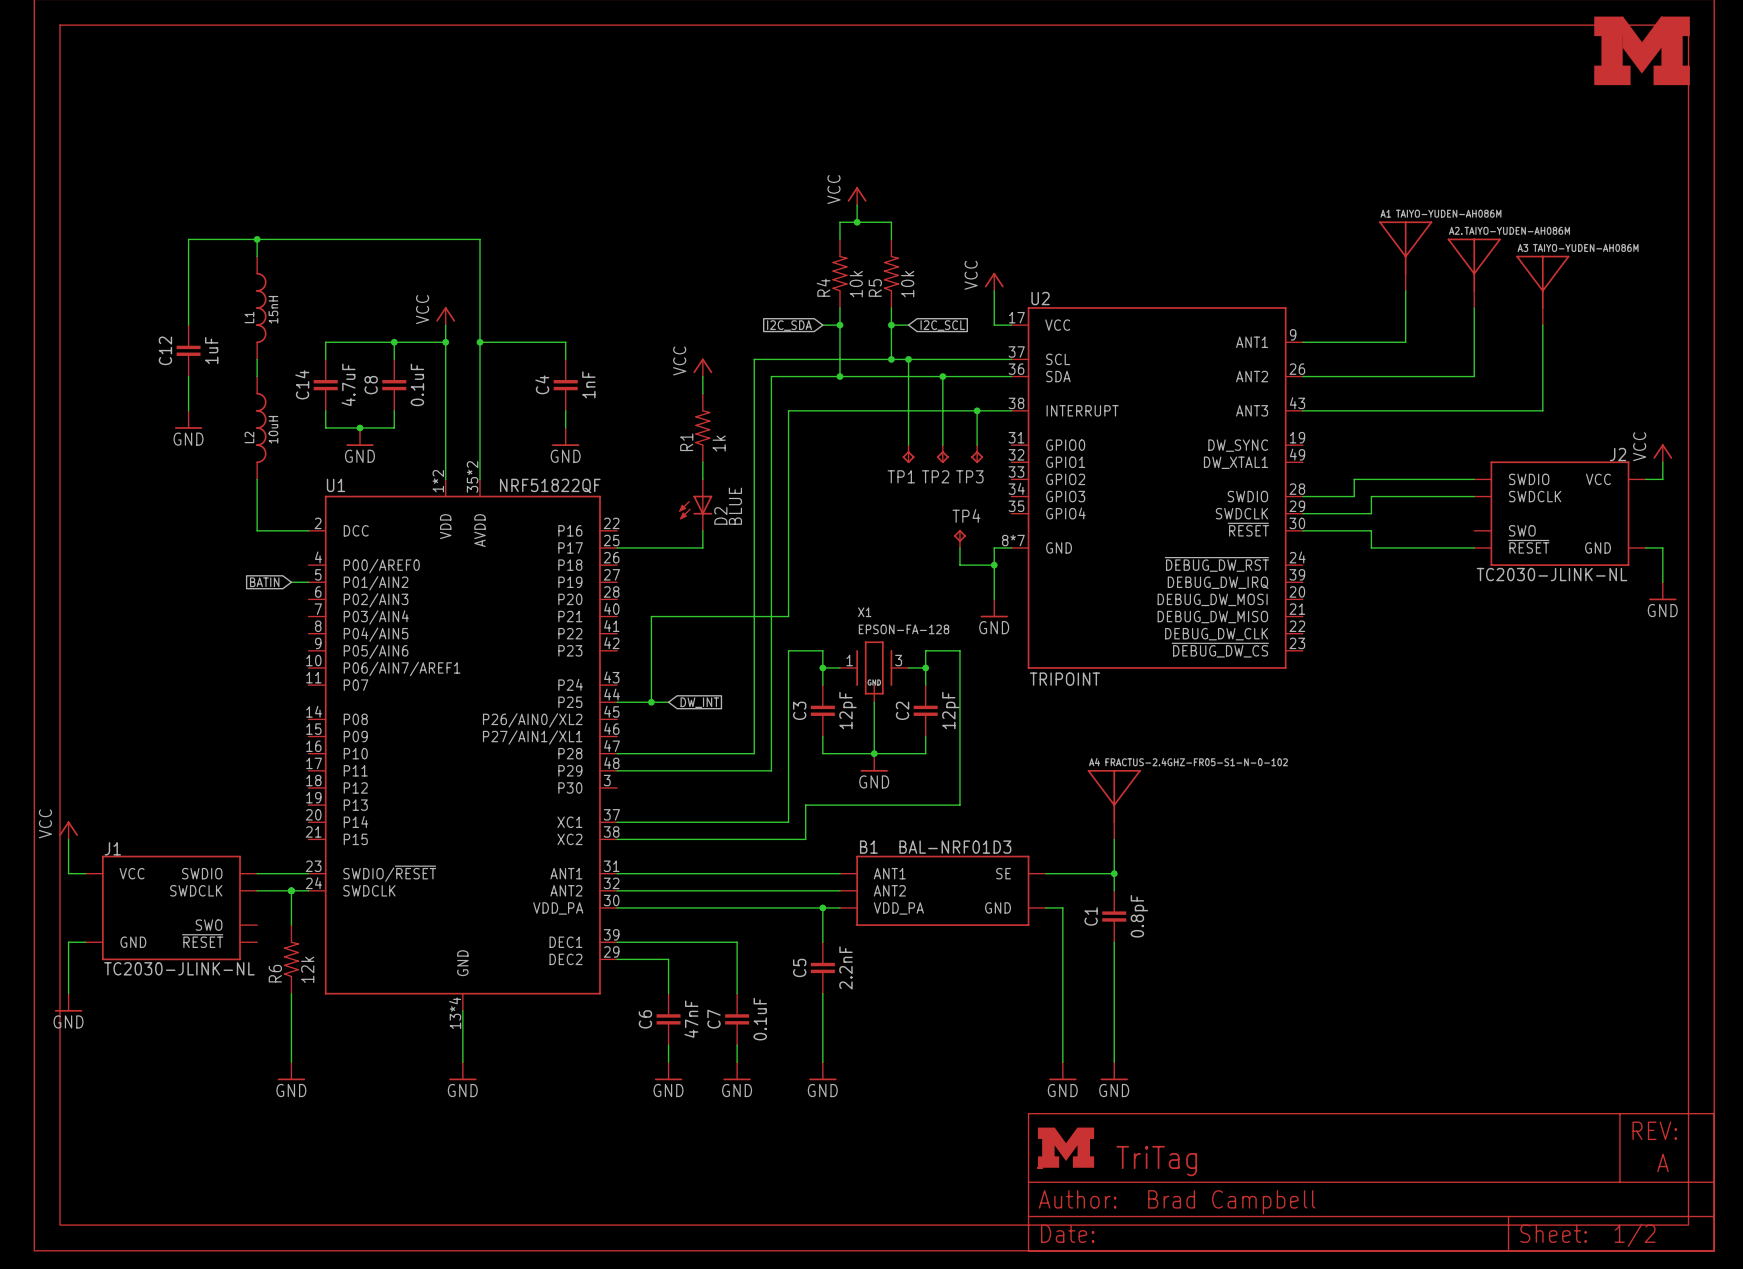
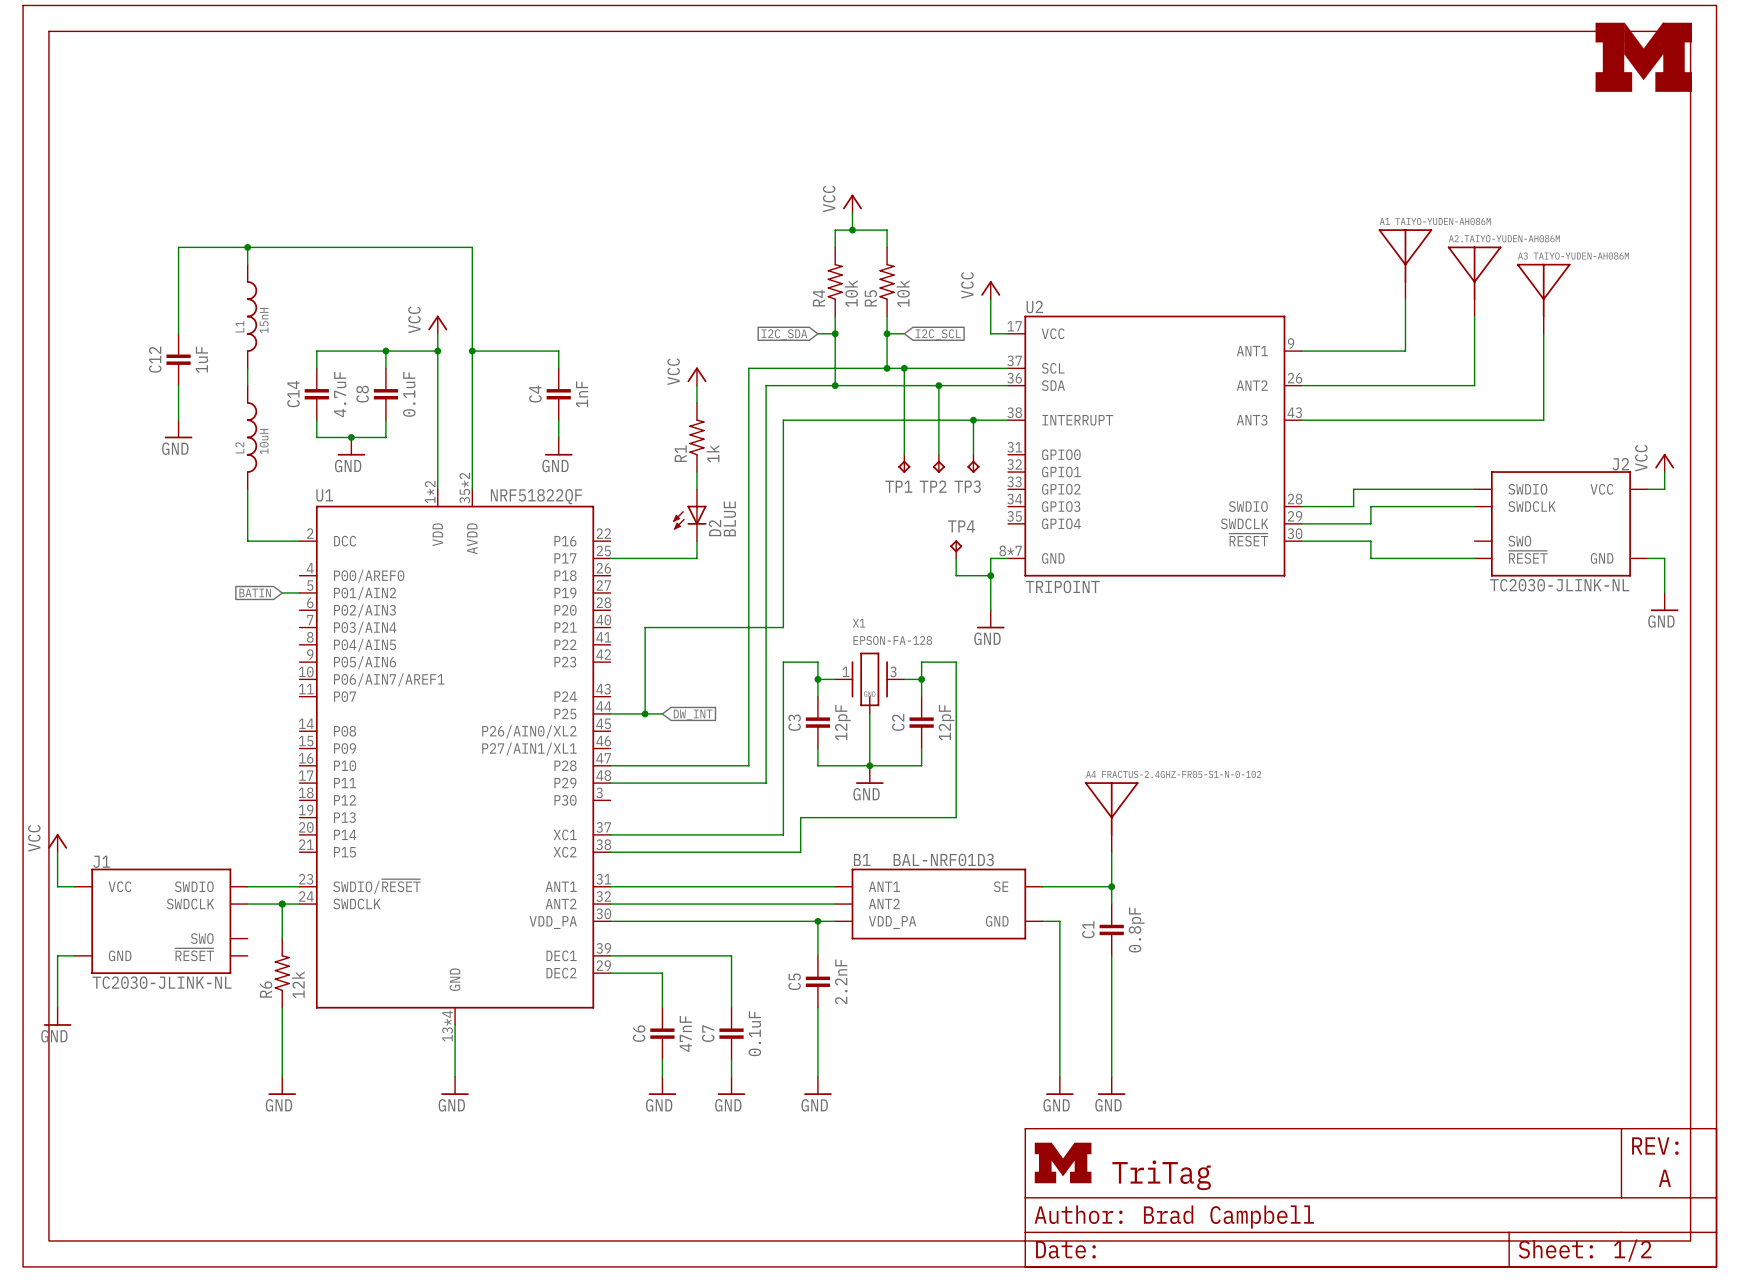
U2 symbol: [1011, 307, 1303, 669] -> [1008, 315, 1302, 577]
U2 value position: TRIPOINT (1064, 679) -> TRIPOINT (1062, 586)

